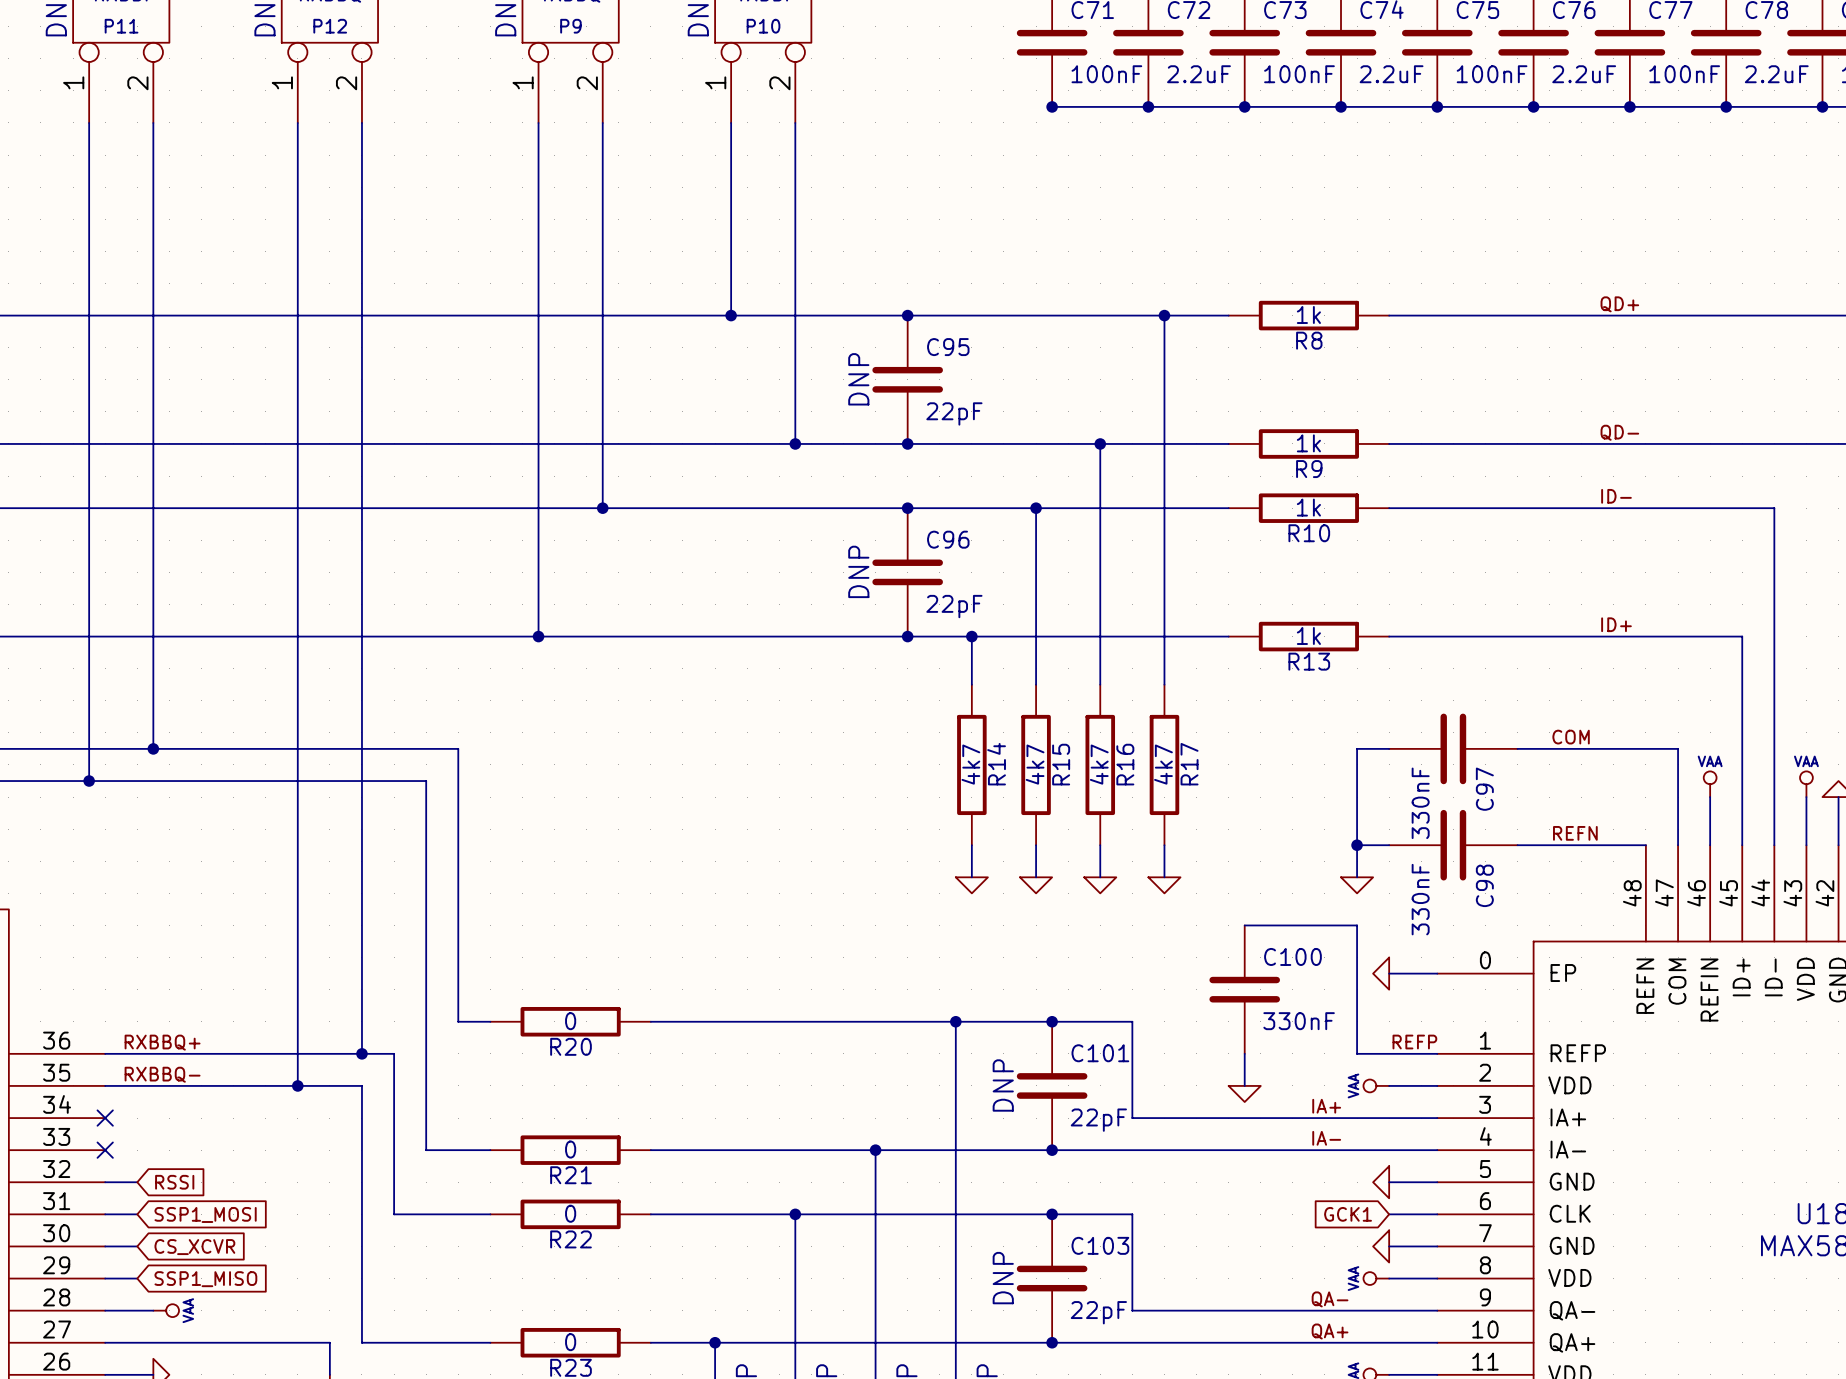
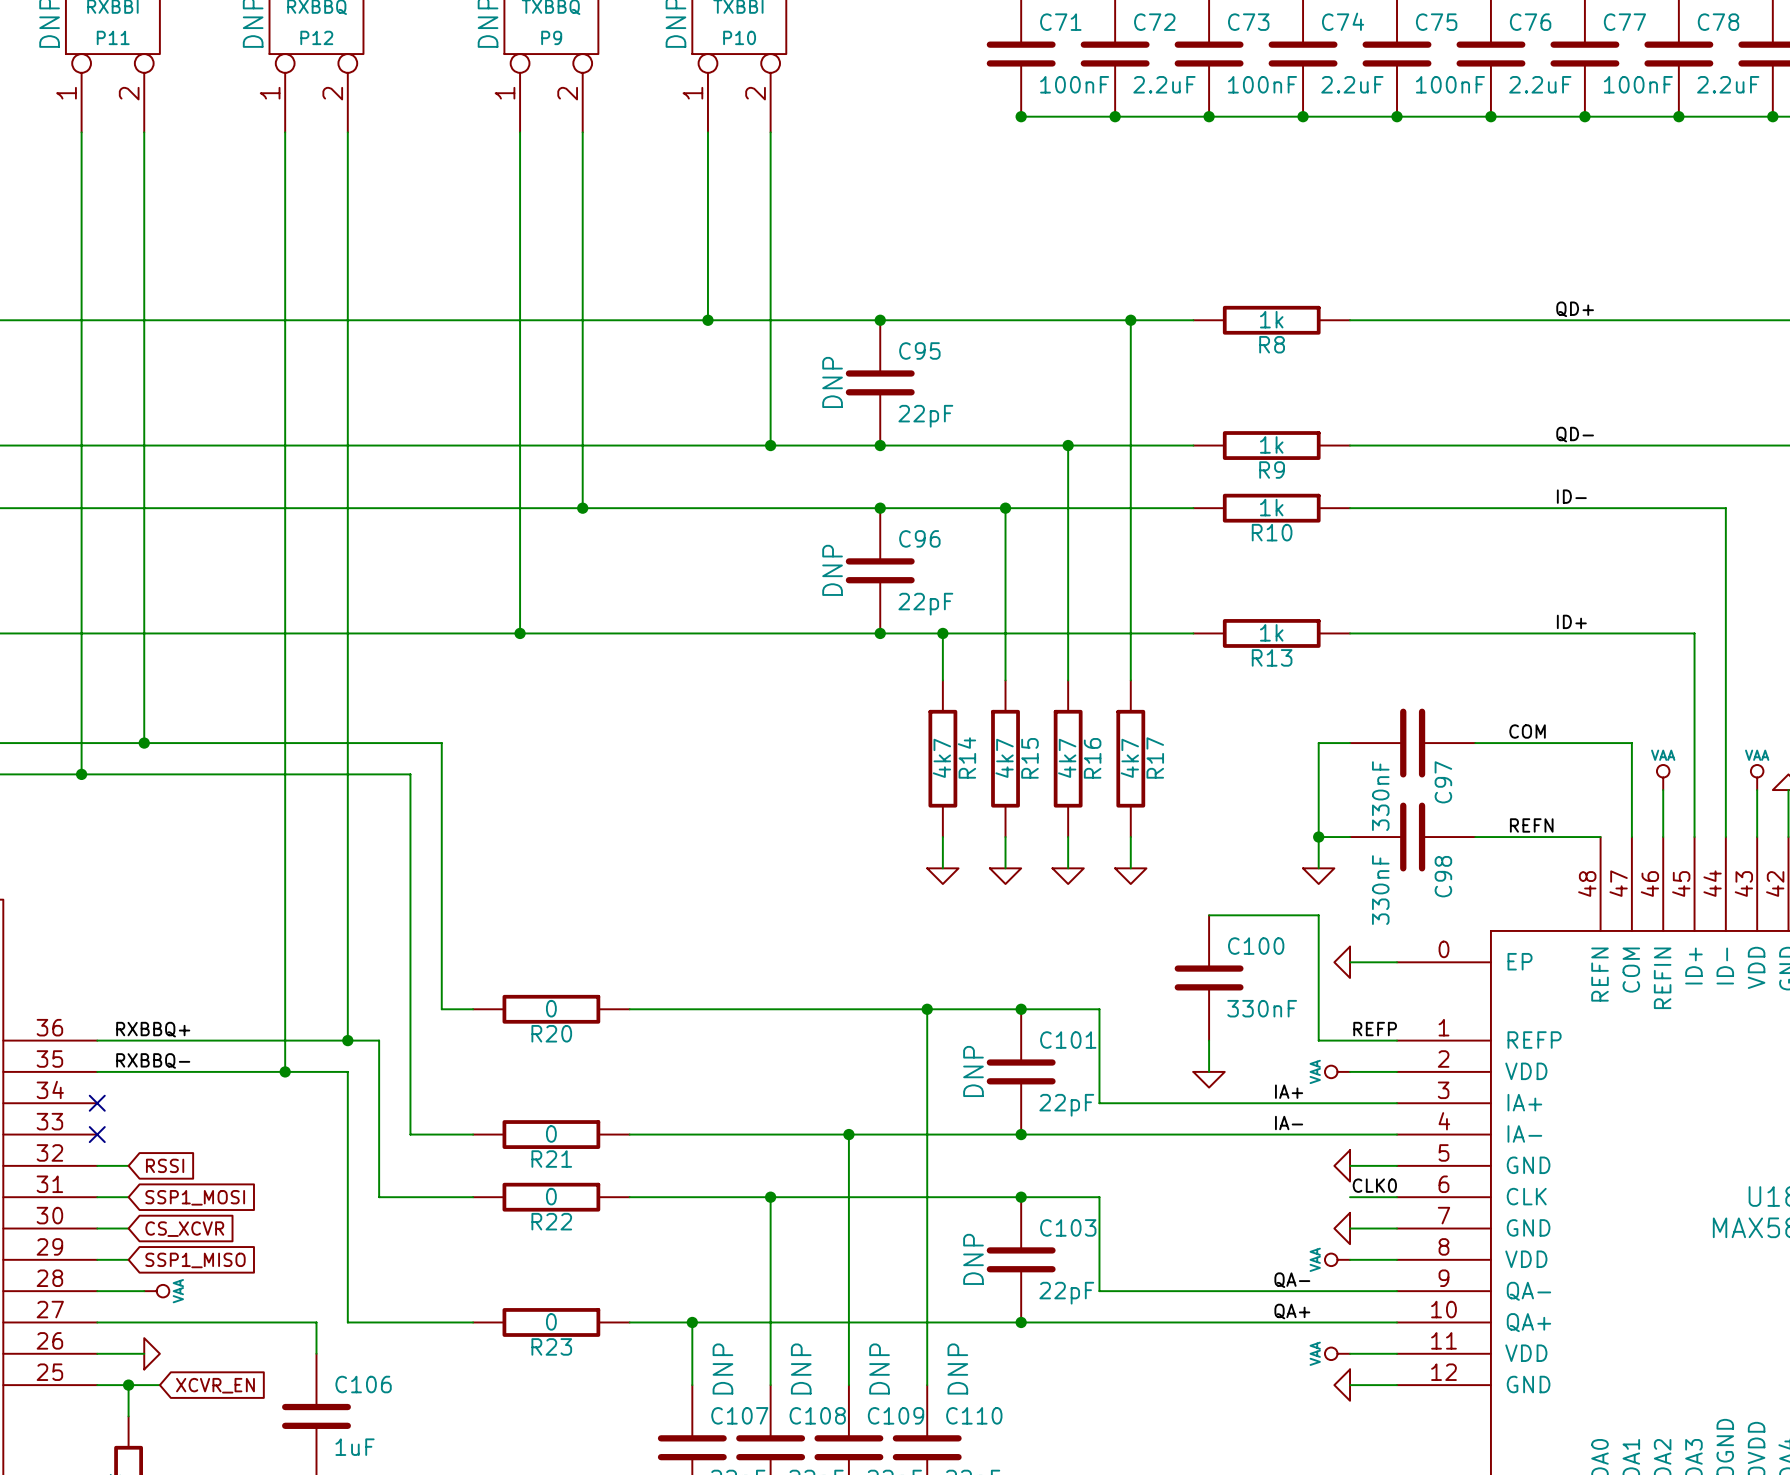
label: none -> CLK0 (1374, 1185)
global label: GCK1 (1348, 1214) -> none

